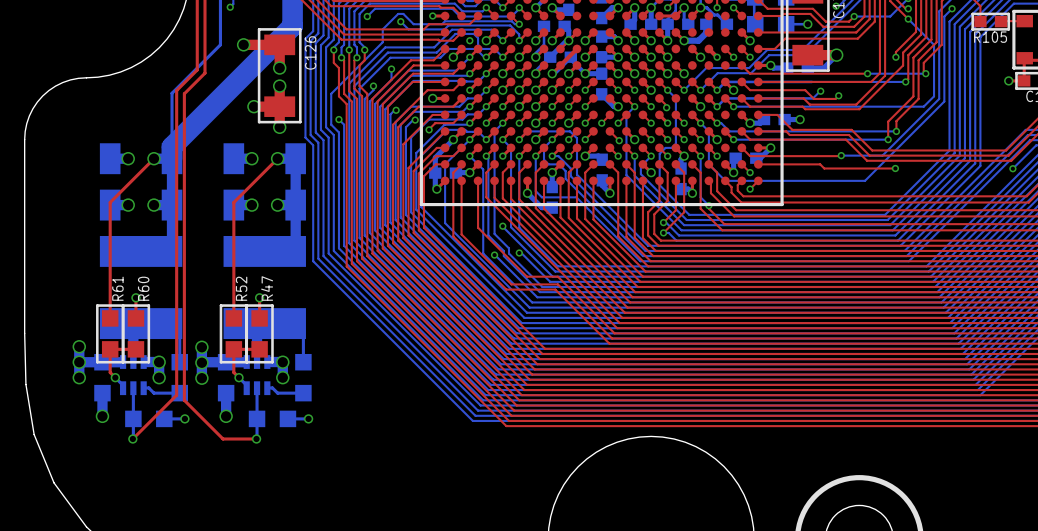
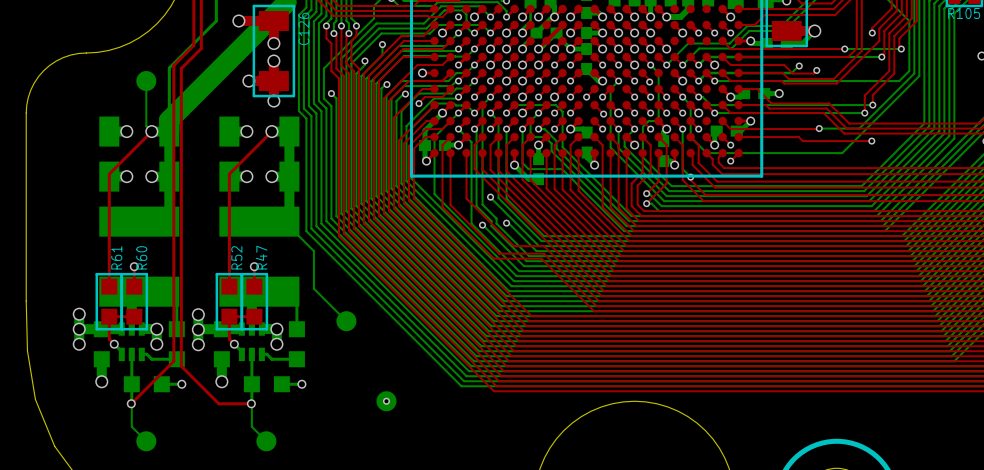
bottom track: none -> (146, 81) (146, 126) (151, 131)
part: none -> (146, 81)
bottom track: none -> (259, 221) (284, 221) (313, 251) (313, 288) (346, 321)
part: none -> (346, 321)
part: none -> (386, 401)
via: none -> (386, 401)
bottom track: none -> (131, 403) (131, 426) (146, 441)
bottom track: none -> (251, 403) (251, 426) (266, 441)
part: none -> (146, 441)
part: none -> (266, 441)

